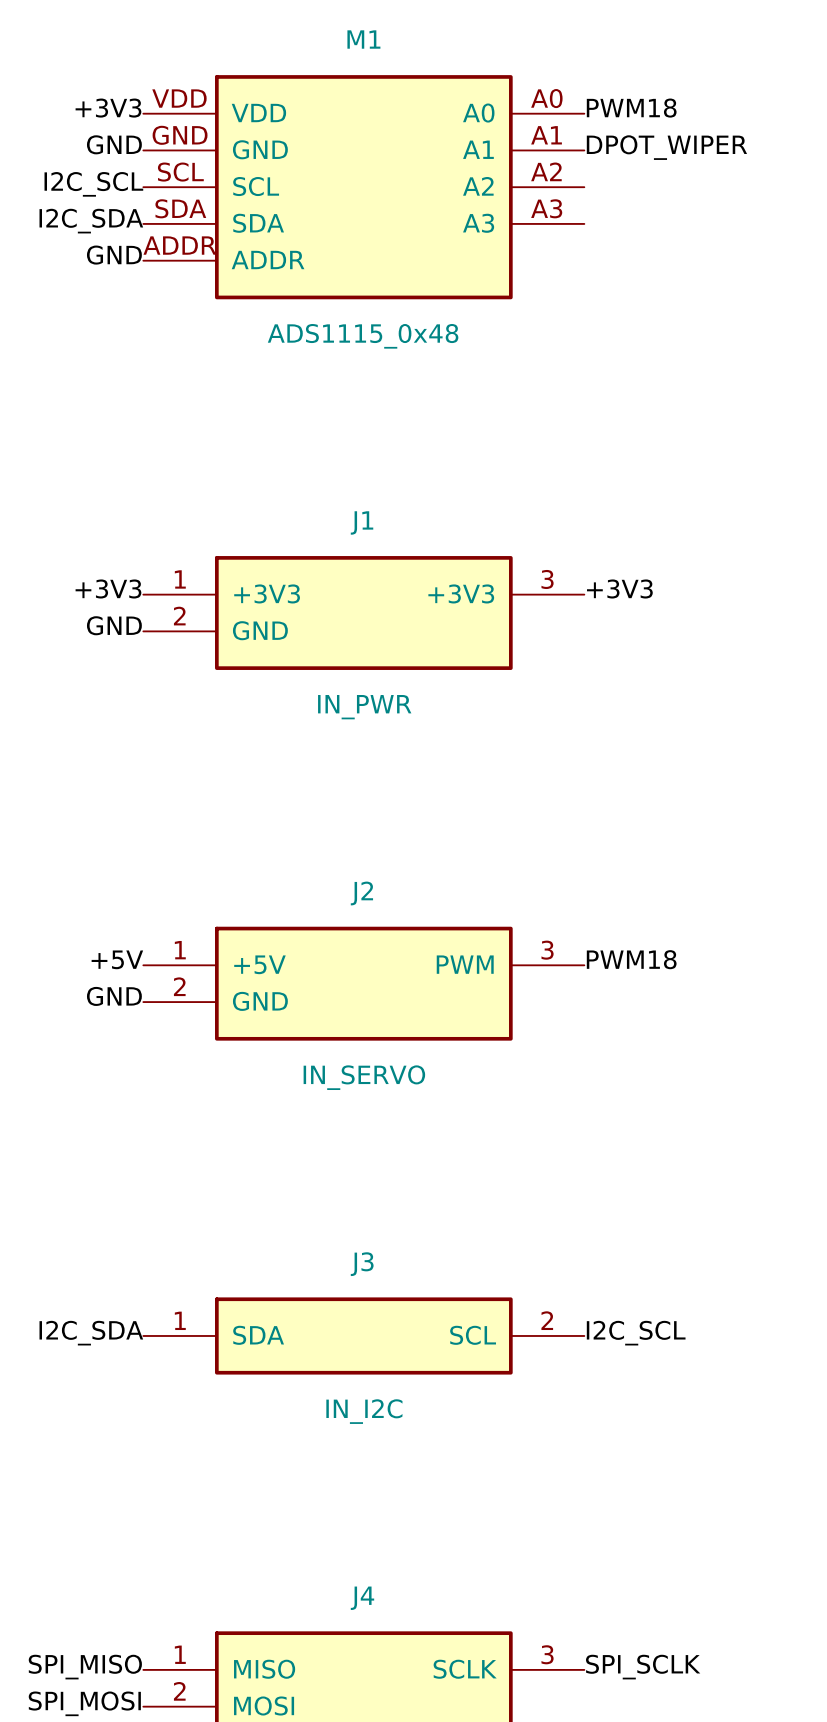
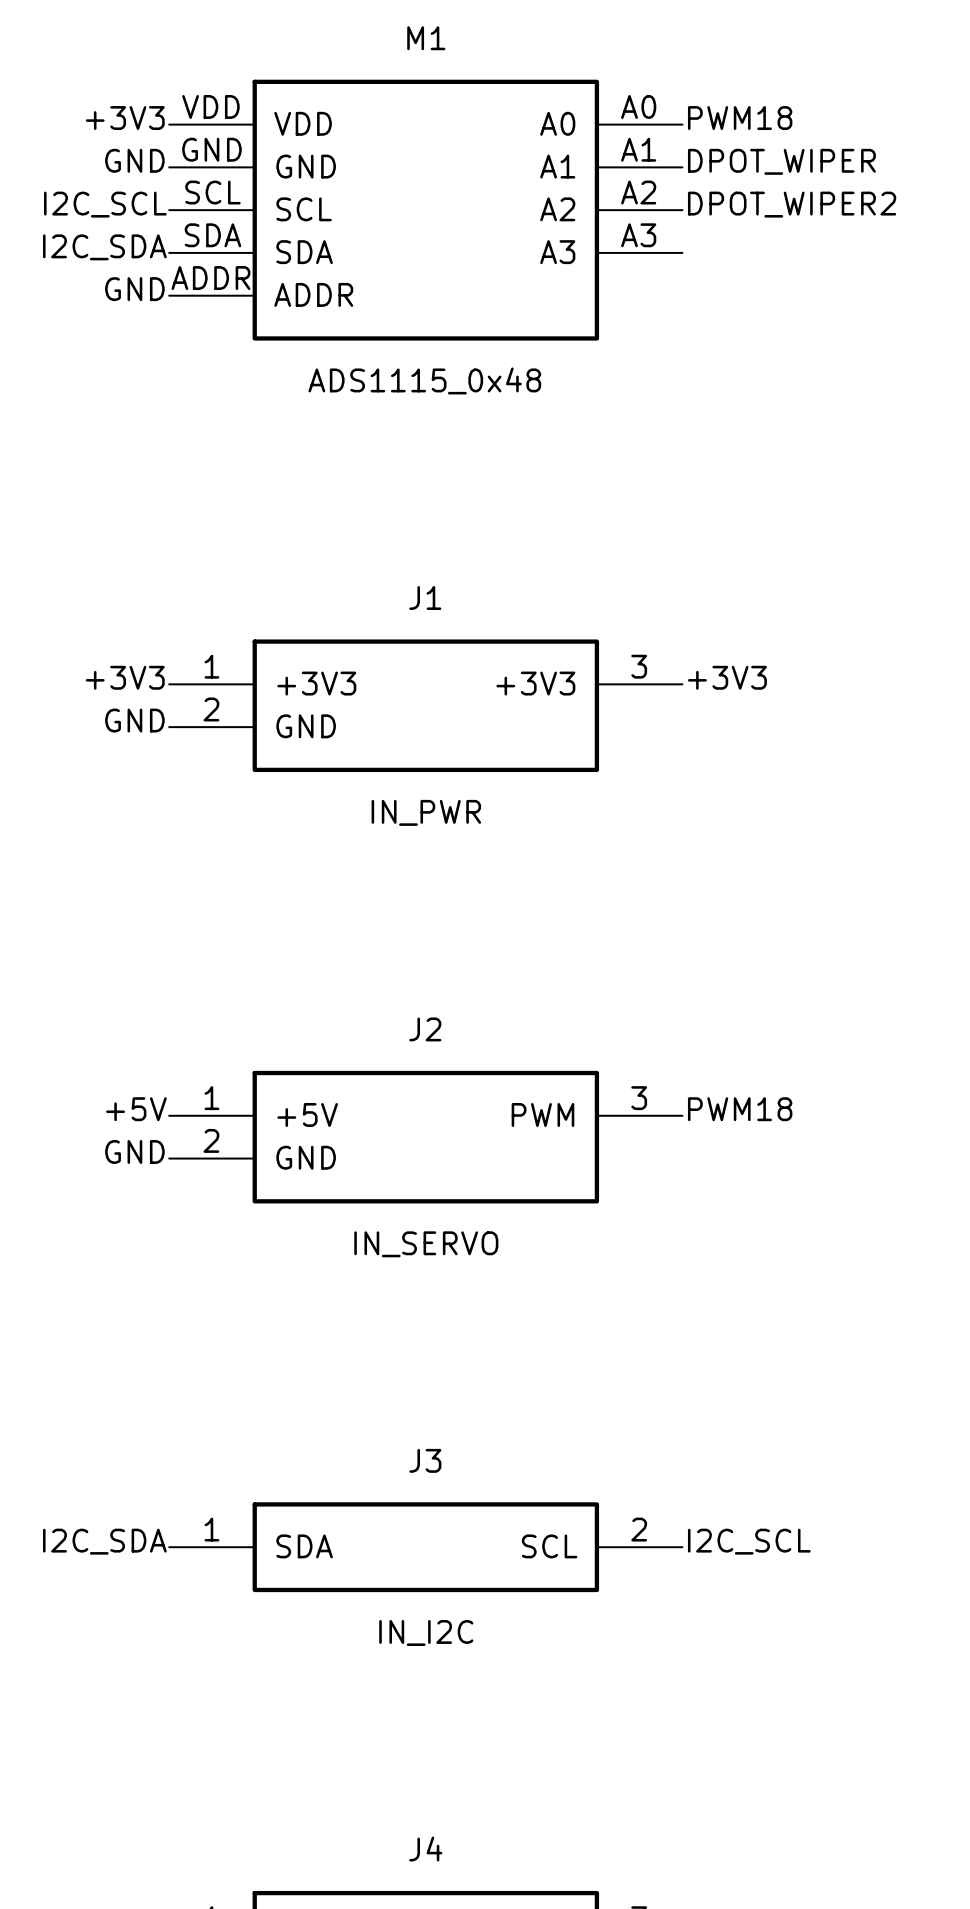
label: none -> DPOT_WIPER2 (792, 204)

